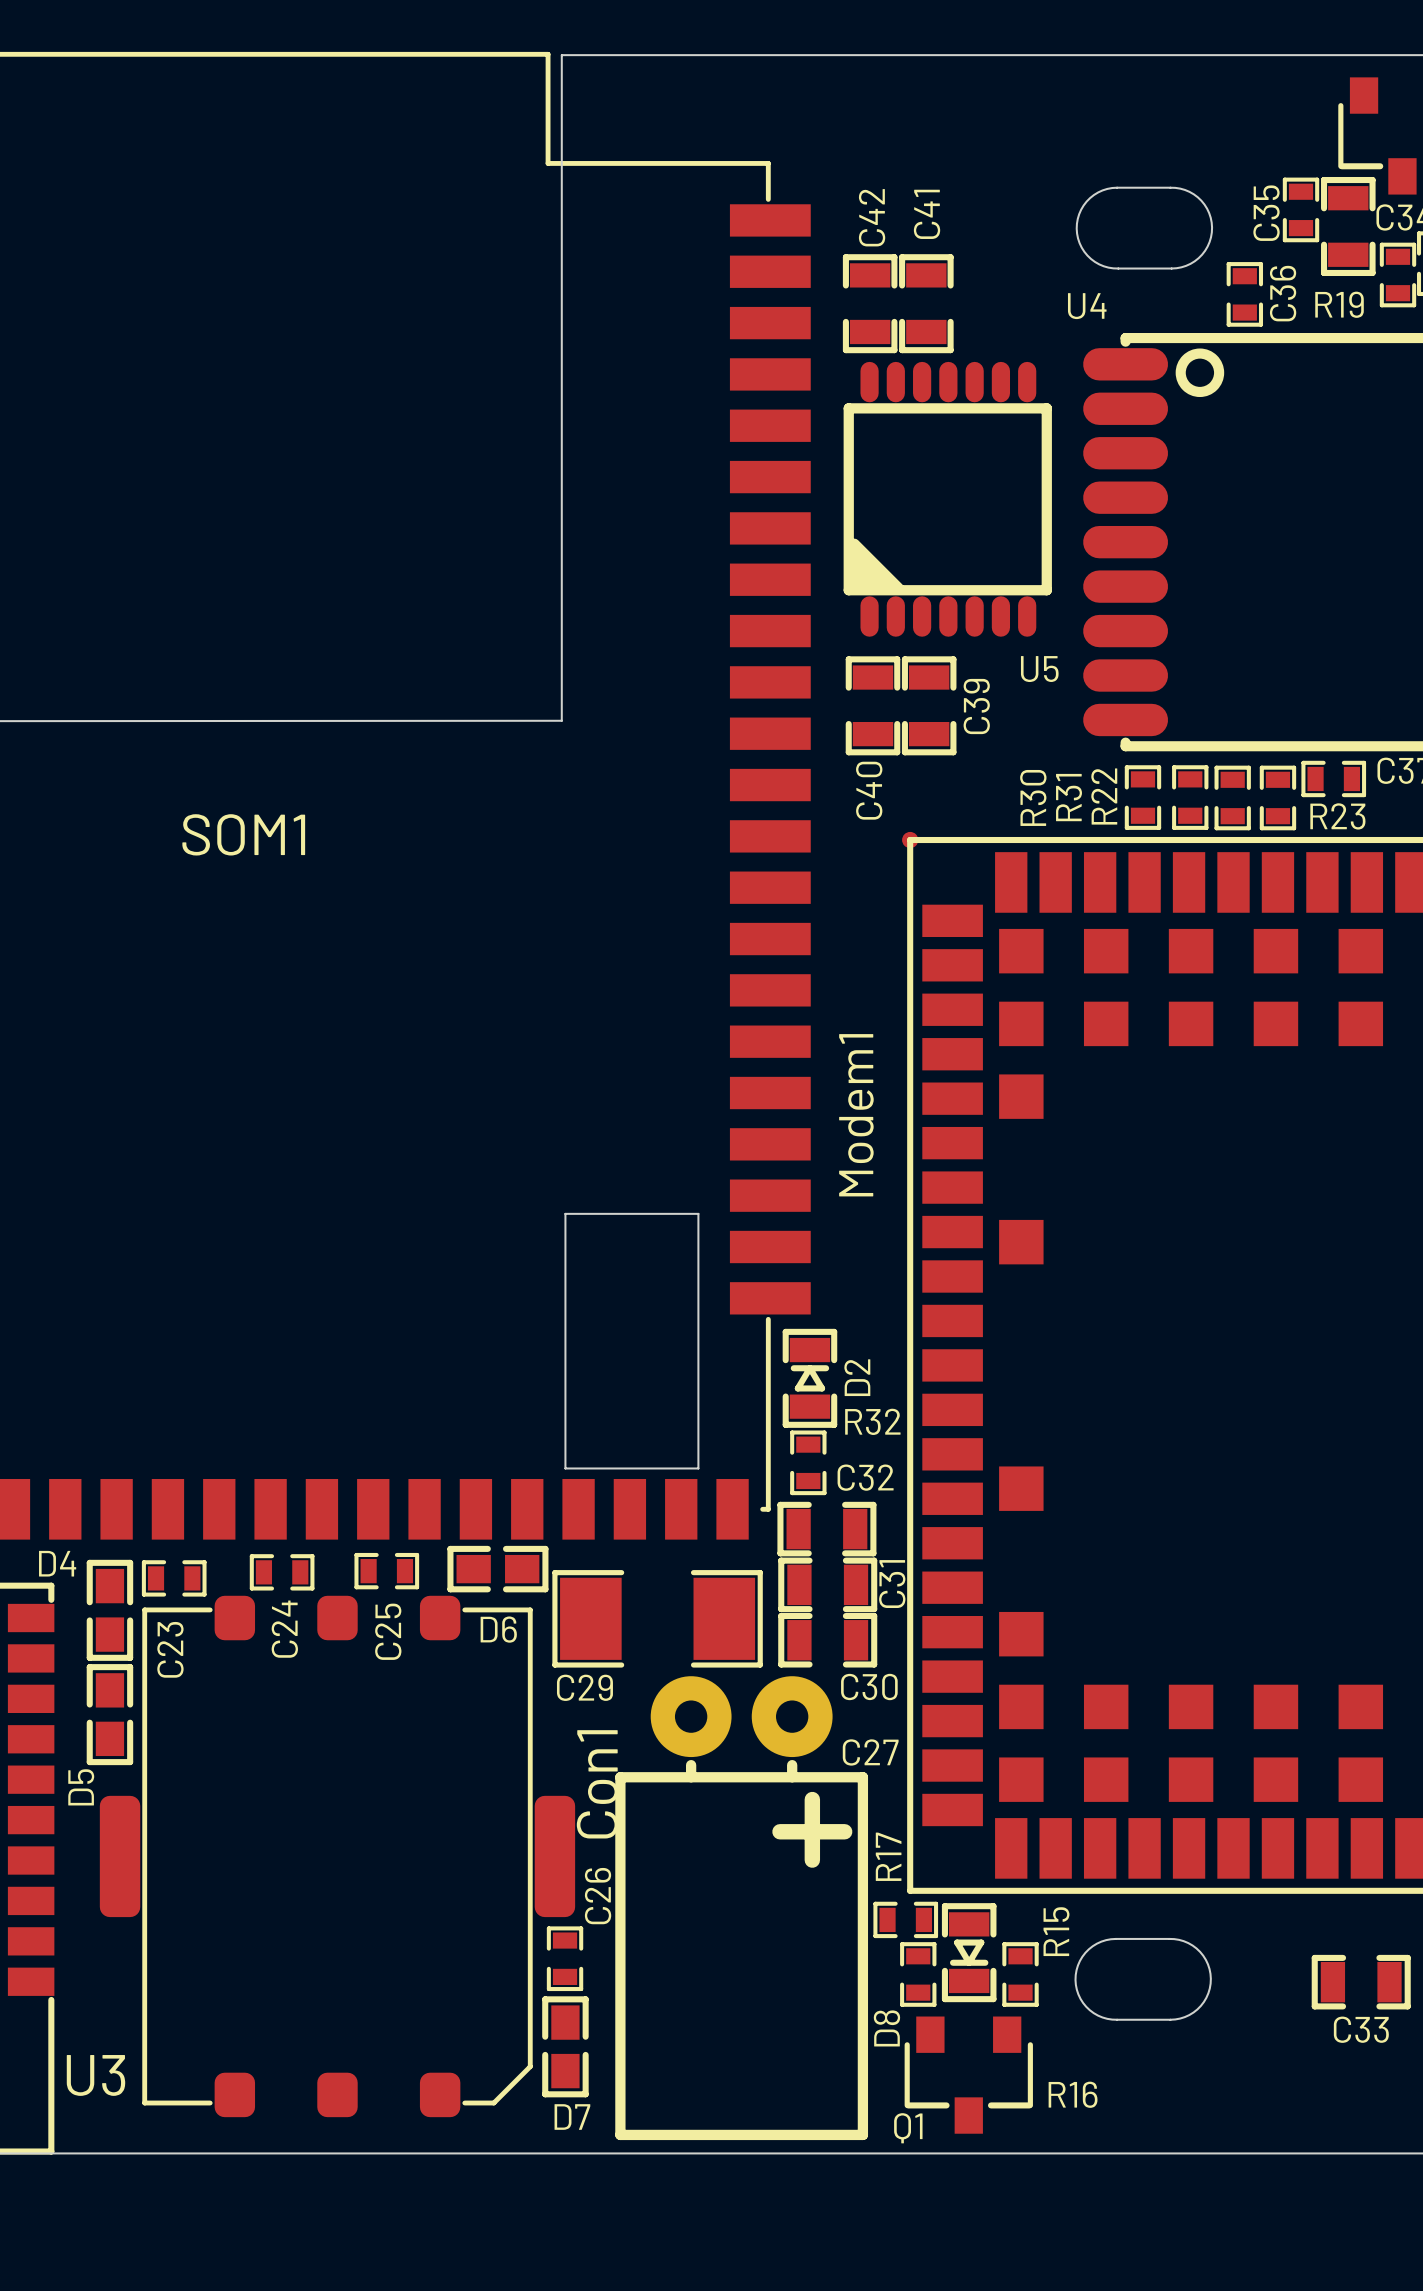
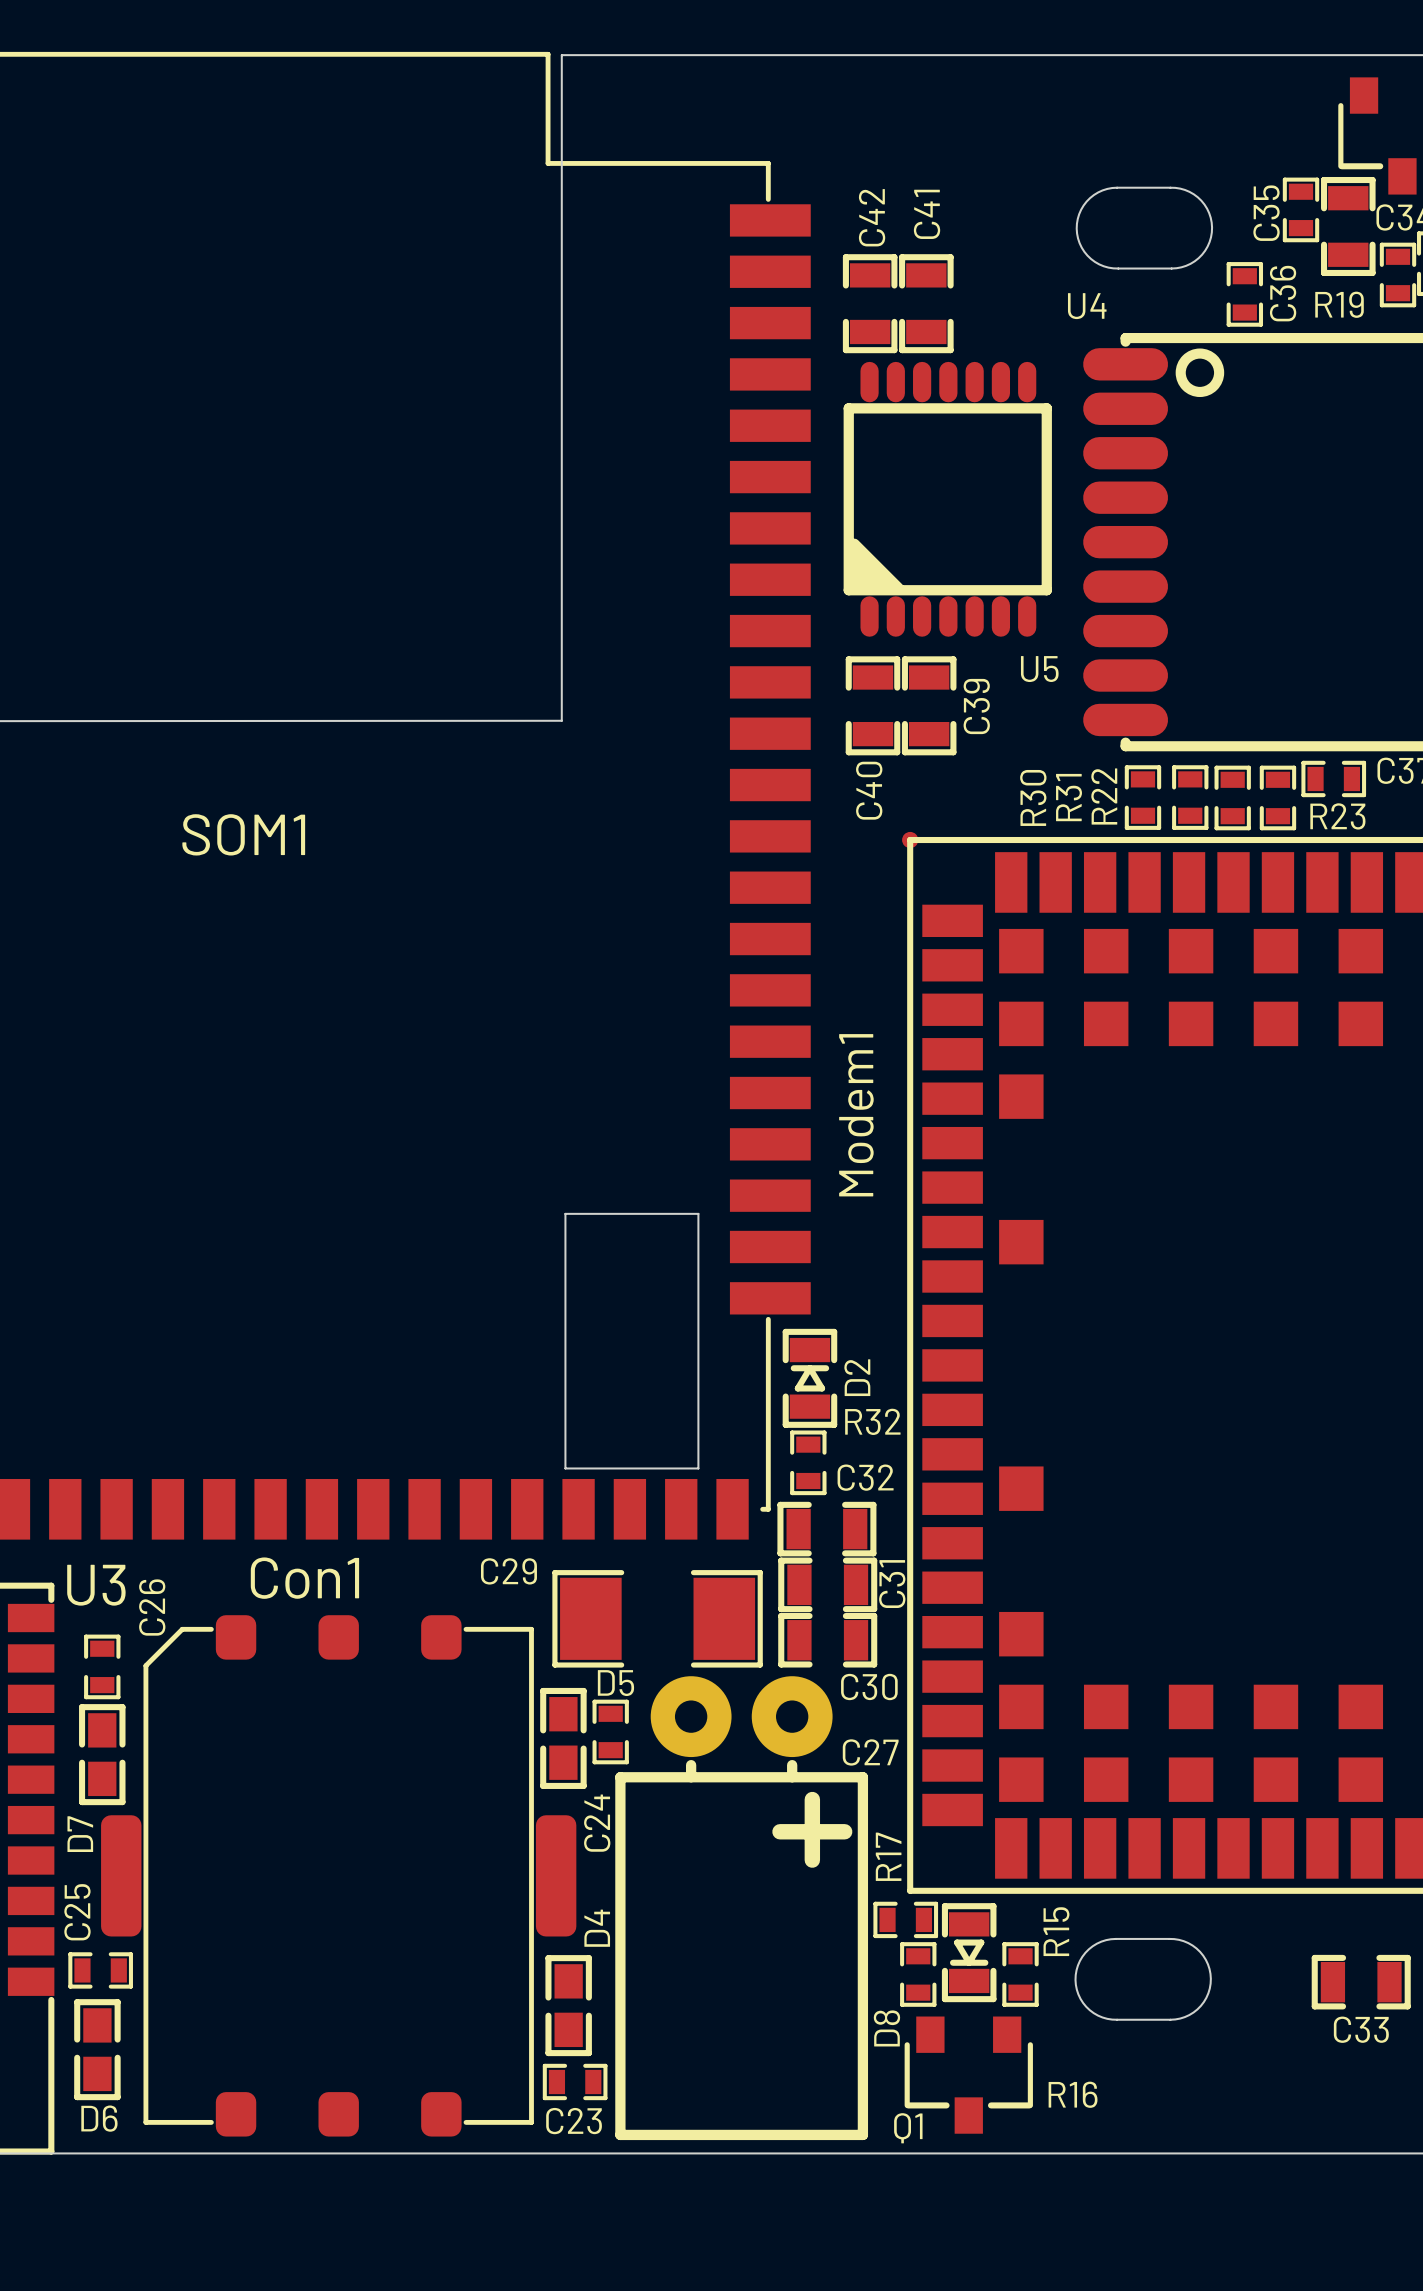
D4 name rotation: 0° (57, 1563) -> 90° counterclockwise (597, 1928)
D4 name position: D4 (57, 1563) -> D4 (597, 1928)
D6 rotation: 0° (497, 1569) -> 90° clockwise (97, 2049)
D6 position: (497, 1569) -> (97, 2049)
C25 position: (386, 1571) -> (100, 1970)
C24 rotation: 0° (282, 1572) -> 90° clockwise (610, 1731)
C24 position: (282, 1572) -> (610, 1731)
C23 position: (174, 1578) -> (575, 2081)
D4 position: (109, 1610) -> (568, 2005)
C25 name position: C25 (388, 1631) -> C25 (77, 1912)
C23 name rotation: 0° (170, 1649) -> 90° clockwise (574, 2121)
C29 name position: C29 (584, 1687) -> C29 (508, 1571)
D5 rotation: 0° (109, 1714) -> 180° (563, 1738)
D5 position: (109, 1714) -> (563, 1738)
Con1 name position: Con1 (597, 1784) -> Con1 (304, 1578)
Con1 rotation: 0° (337, 1856) -> 180° (338, 1875)
C26 name position: C26 (598, 1896) -> C26 (152, 1607)
C26 position: (565, 1958) -> (102, 1666)
D7 position: (565, 2046) -> (102, 1754)
U3 name position: U3 (96, 2075) -> U3 (96, 1585)
D7 name rotation: 0° (572, 2117) -> 90° counterclockwise (80, 1834)

